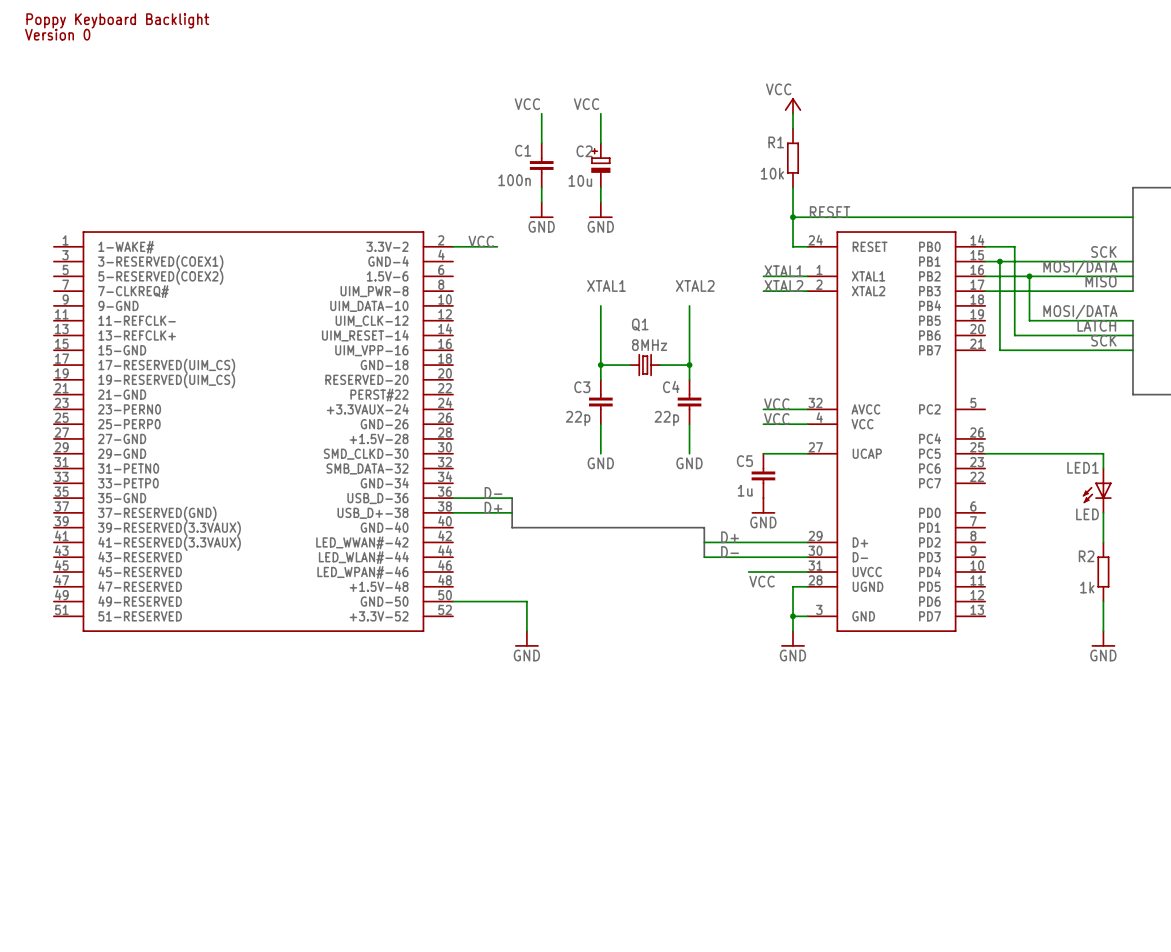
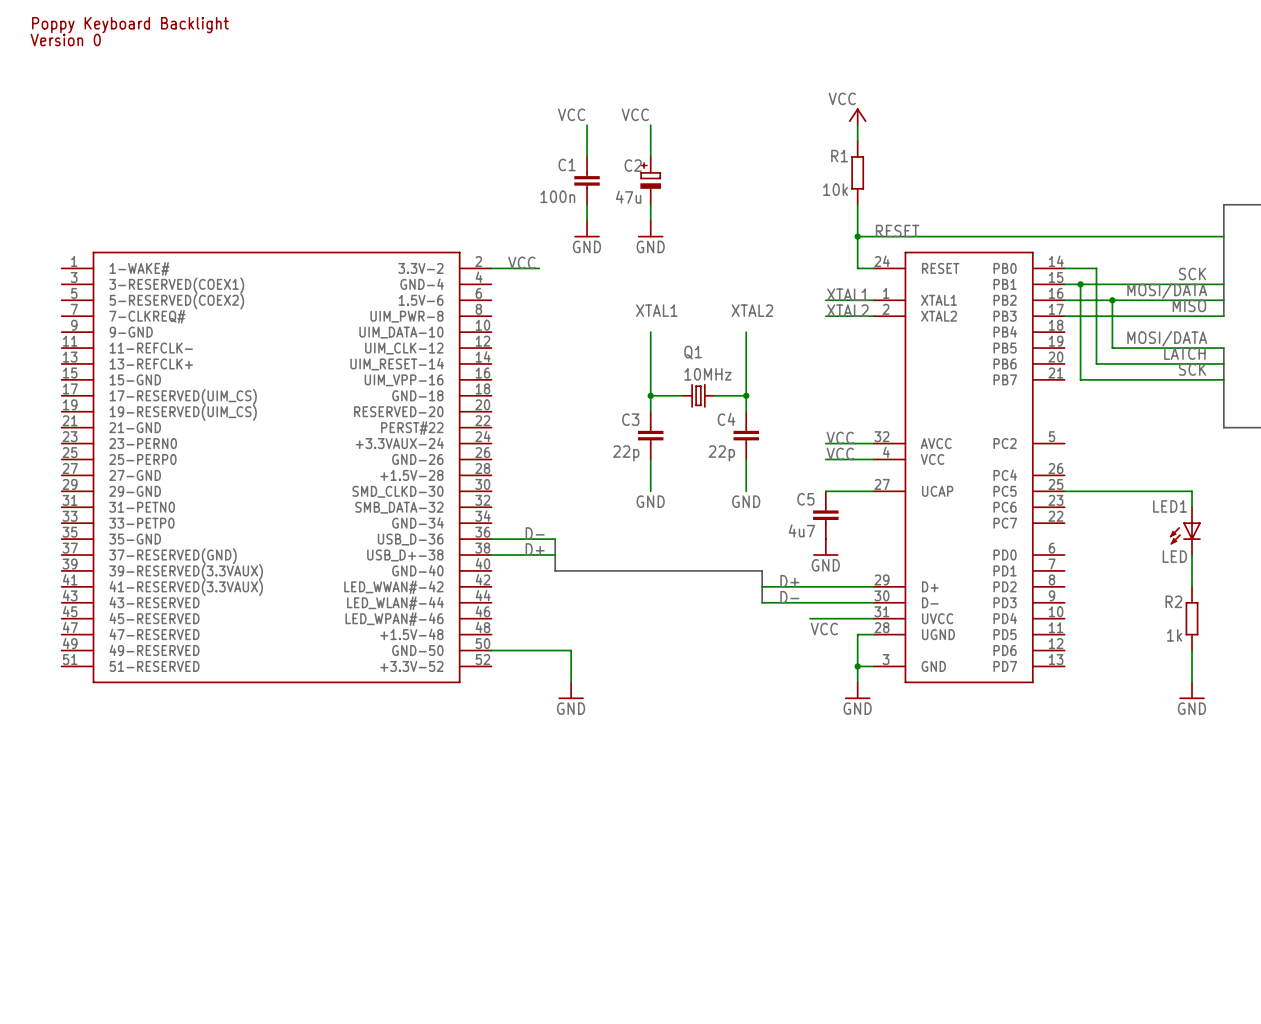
C2 value: 10u (580, 180) -> 47u (628, 197)
Q1 value: 8MHz (649, 345) -> 10MHz (707, 374)
C5 value: 1u (745, 490) -> 4u7 (801, 530)

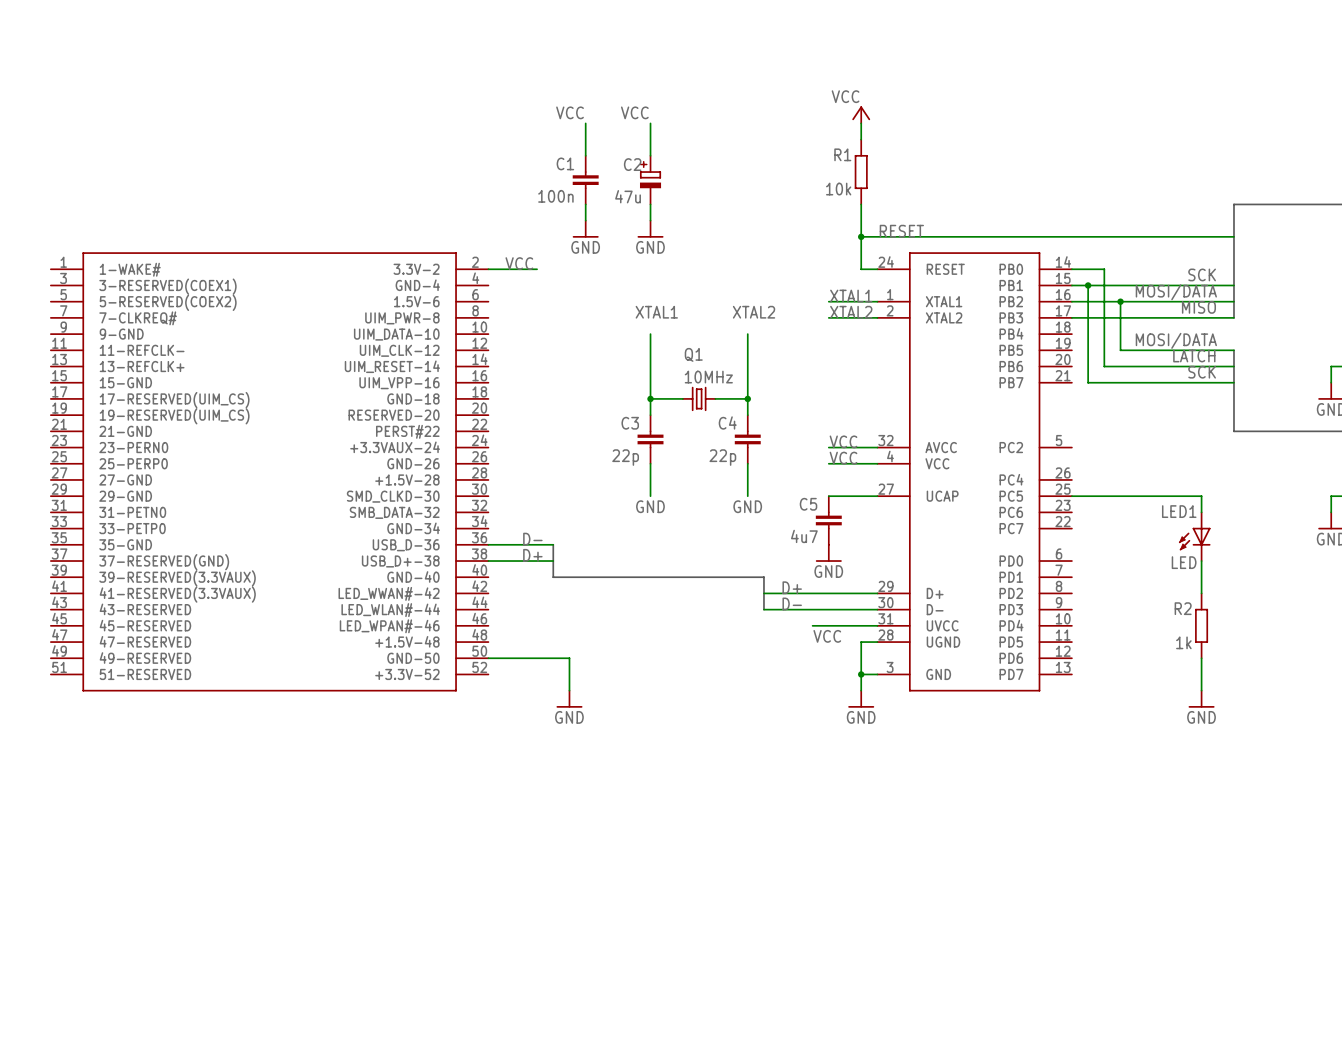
text: Poppy Keyboard Backlight (130, 25) -> none
text: Version 0 (65, 39) -> none

